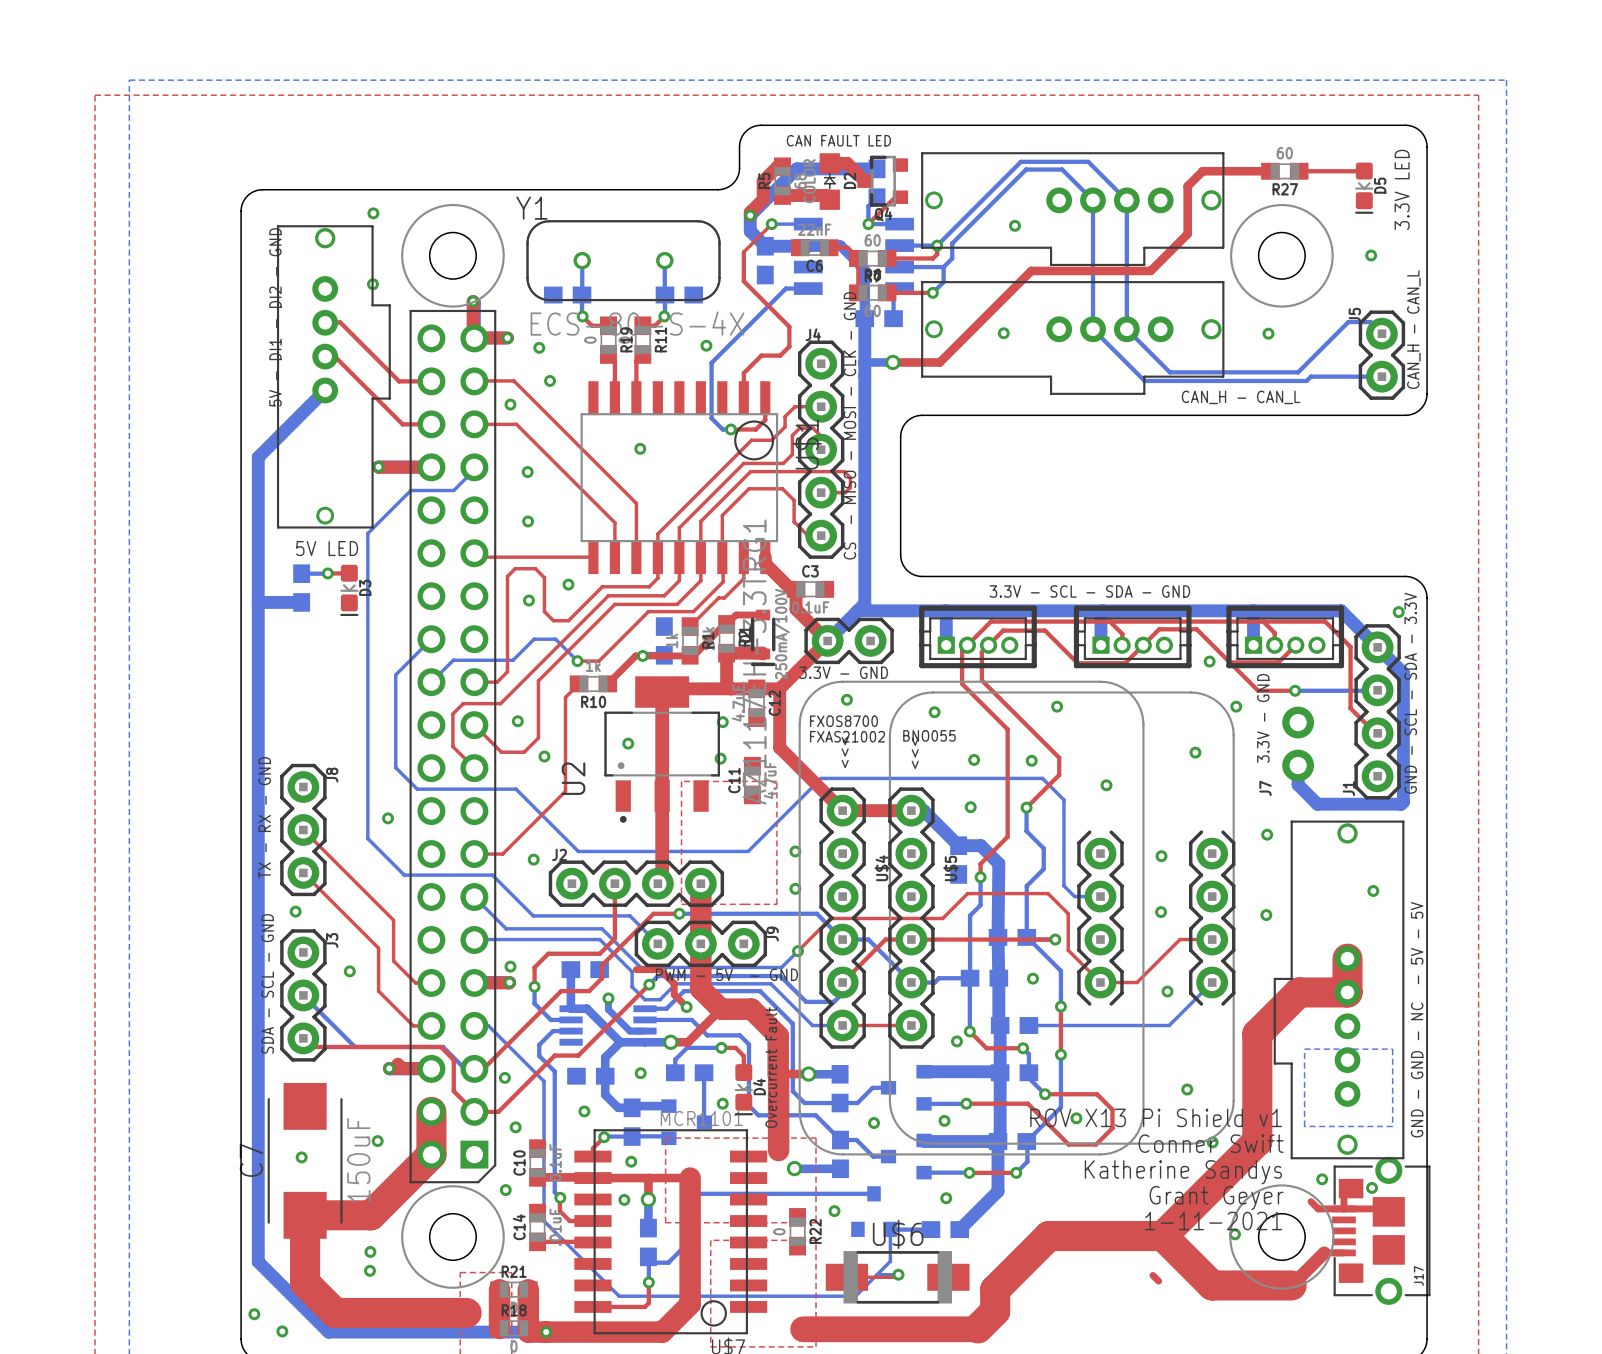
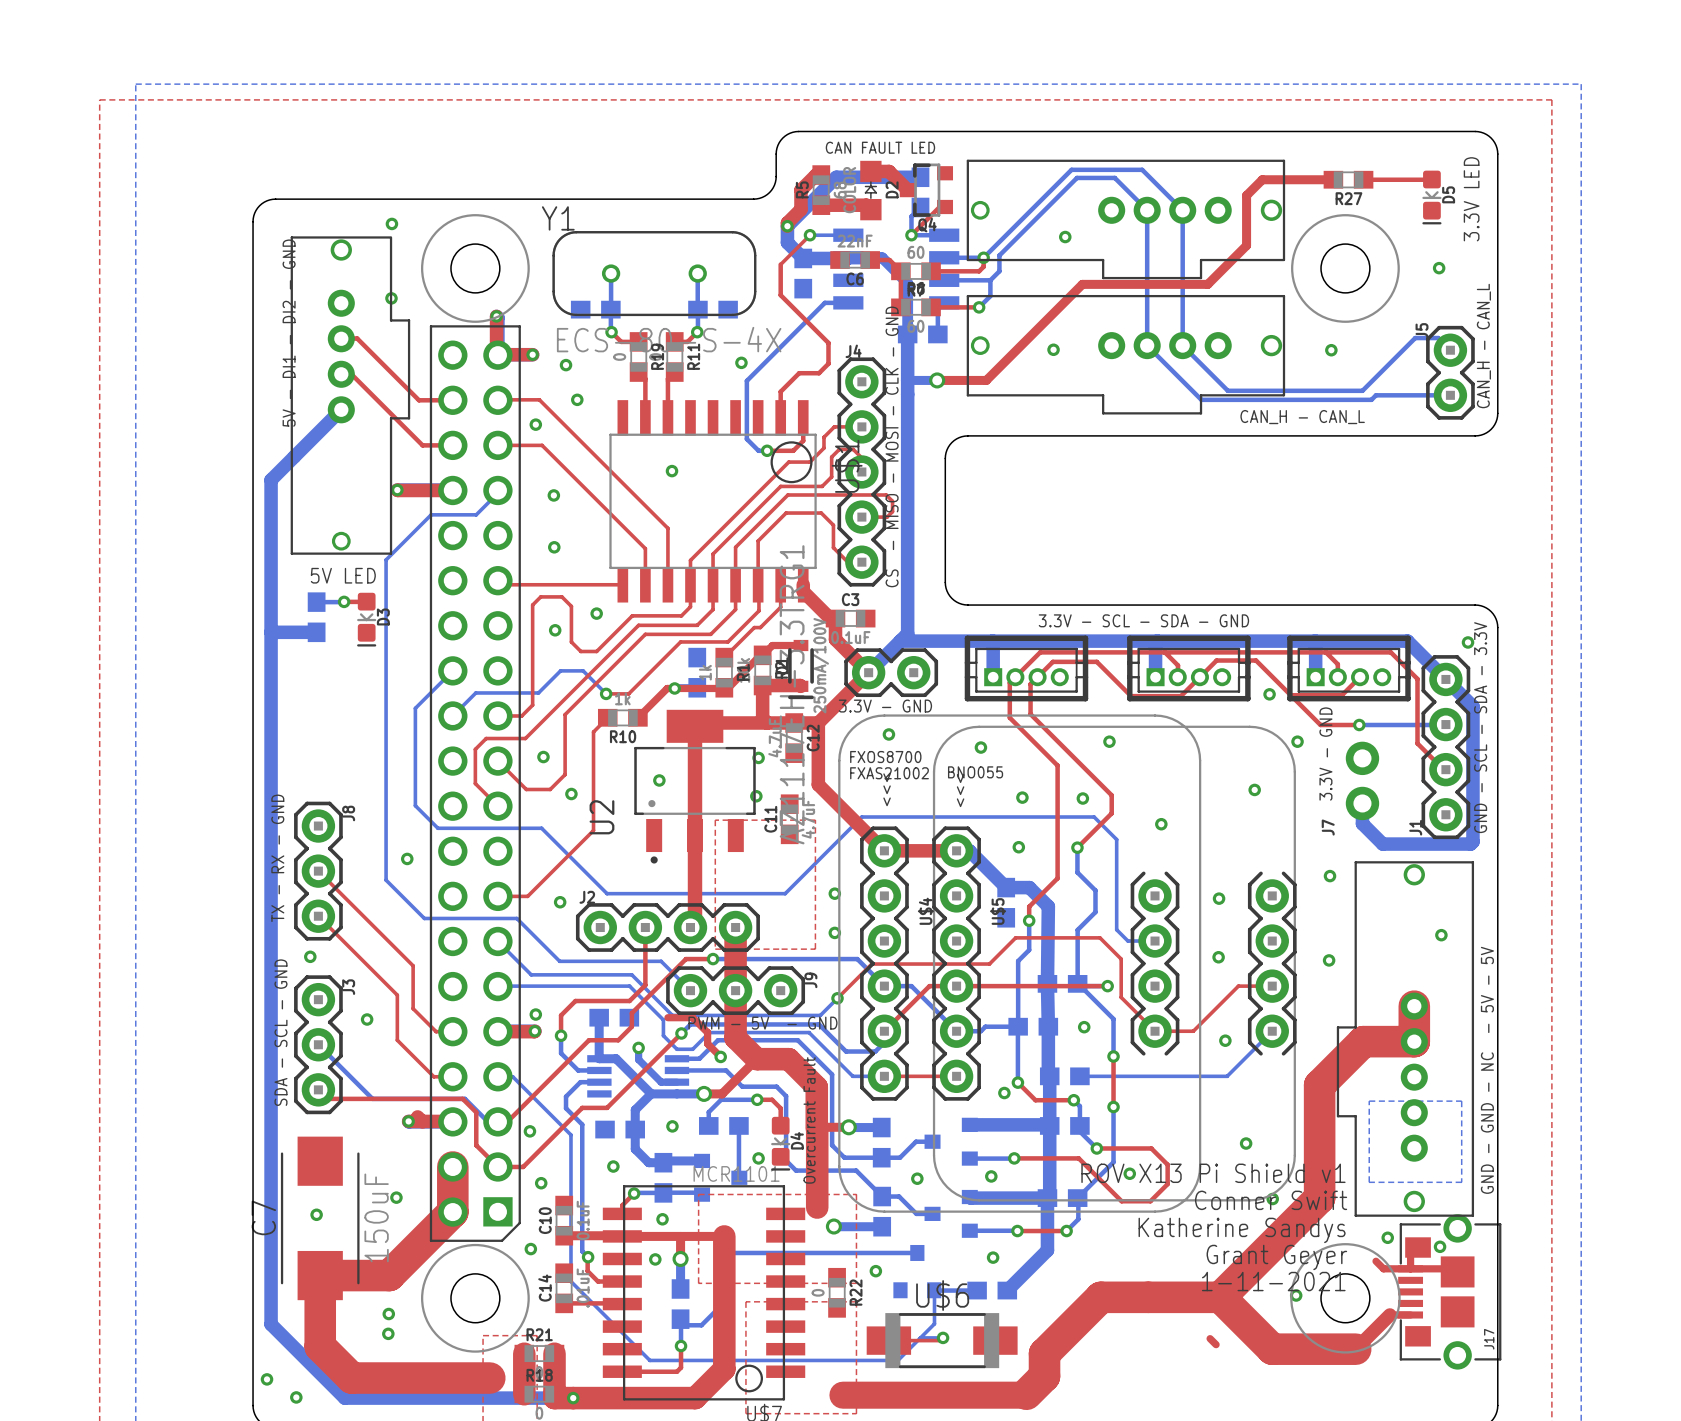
R27 value: 60 (1284, 153) -> none

